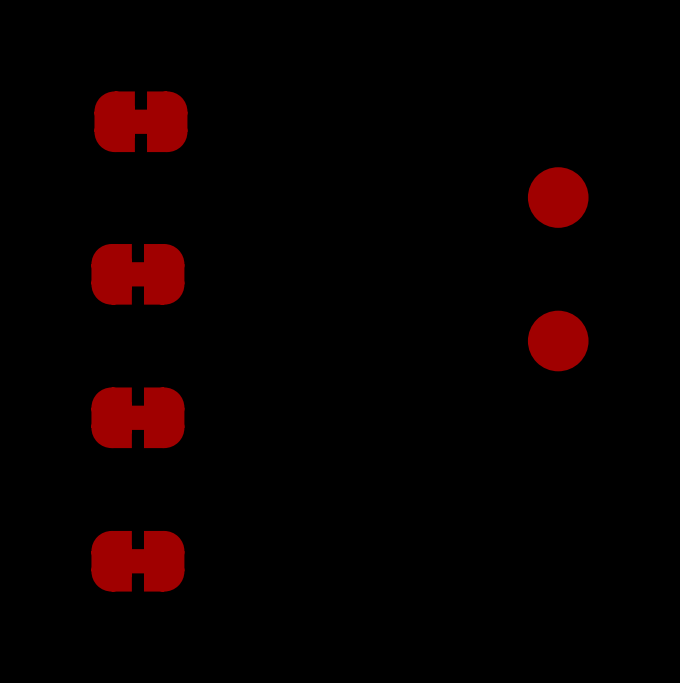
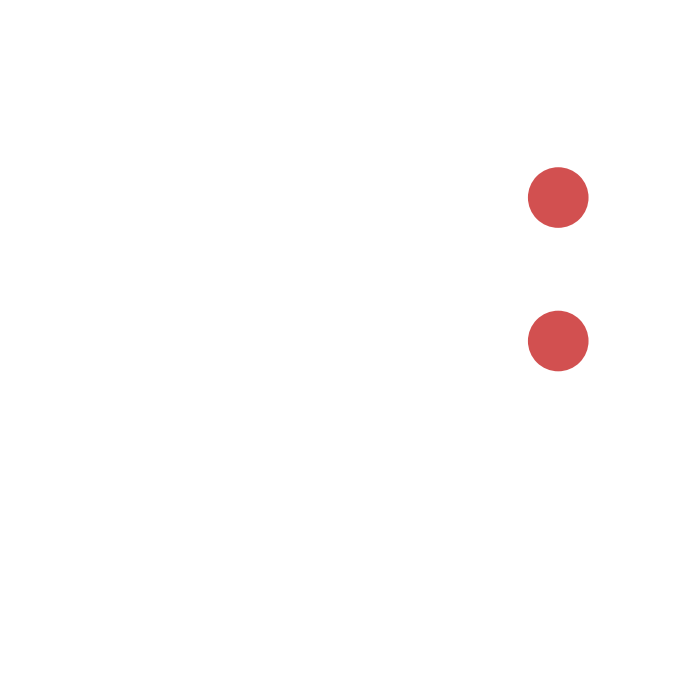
part: (140, 121) -> none
part: (137, 274) -> none
part: (137, 417) -> none
part: (137, 561) -> none

